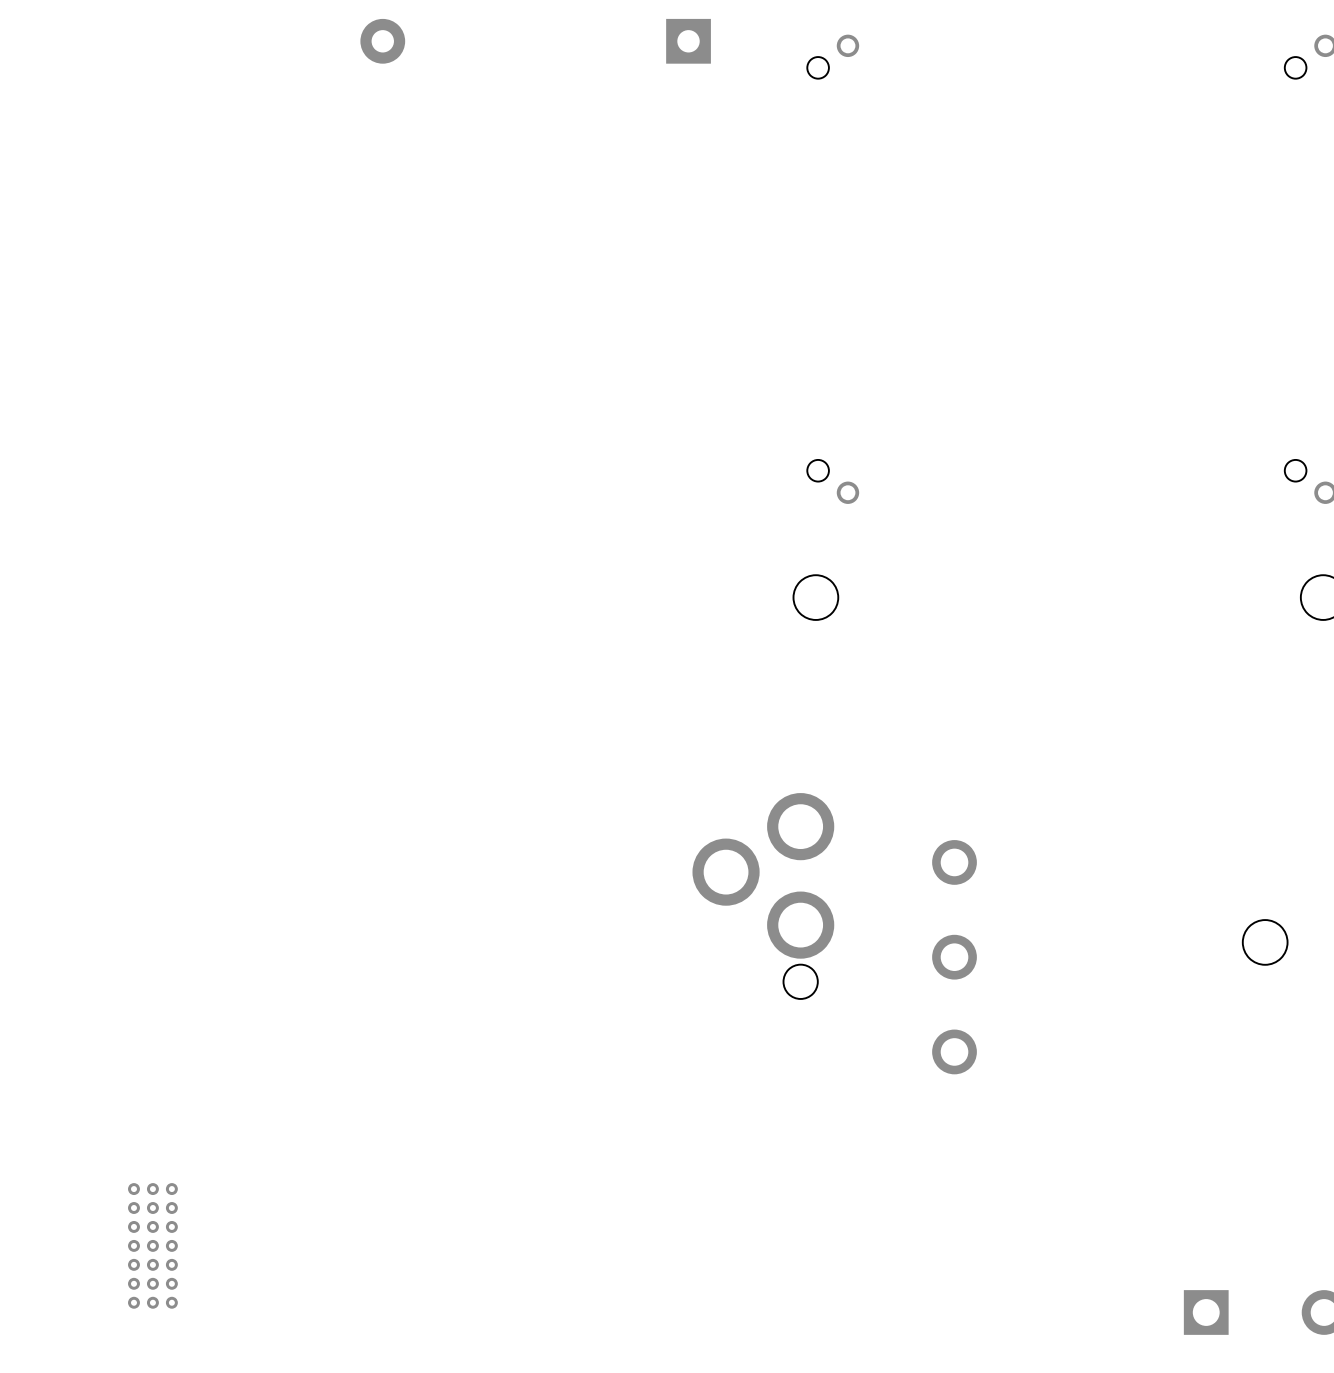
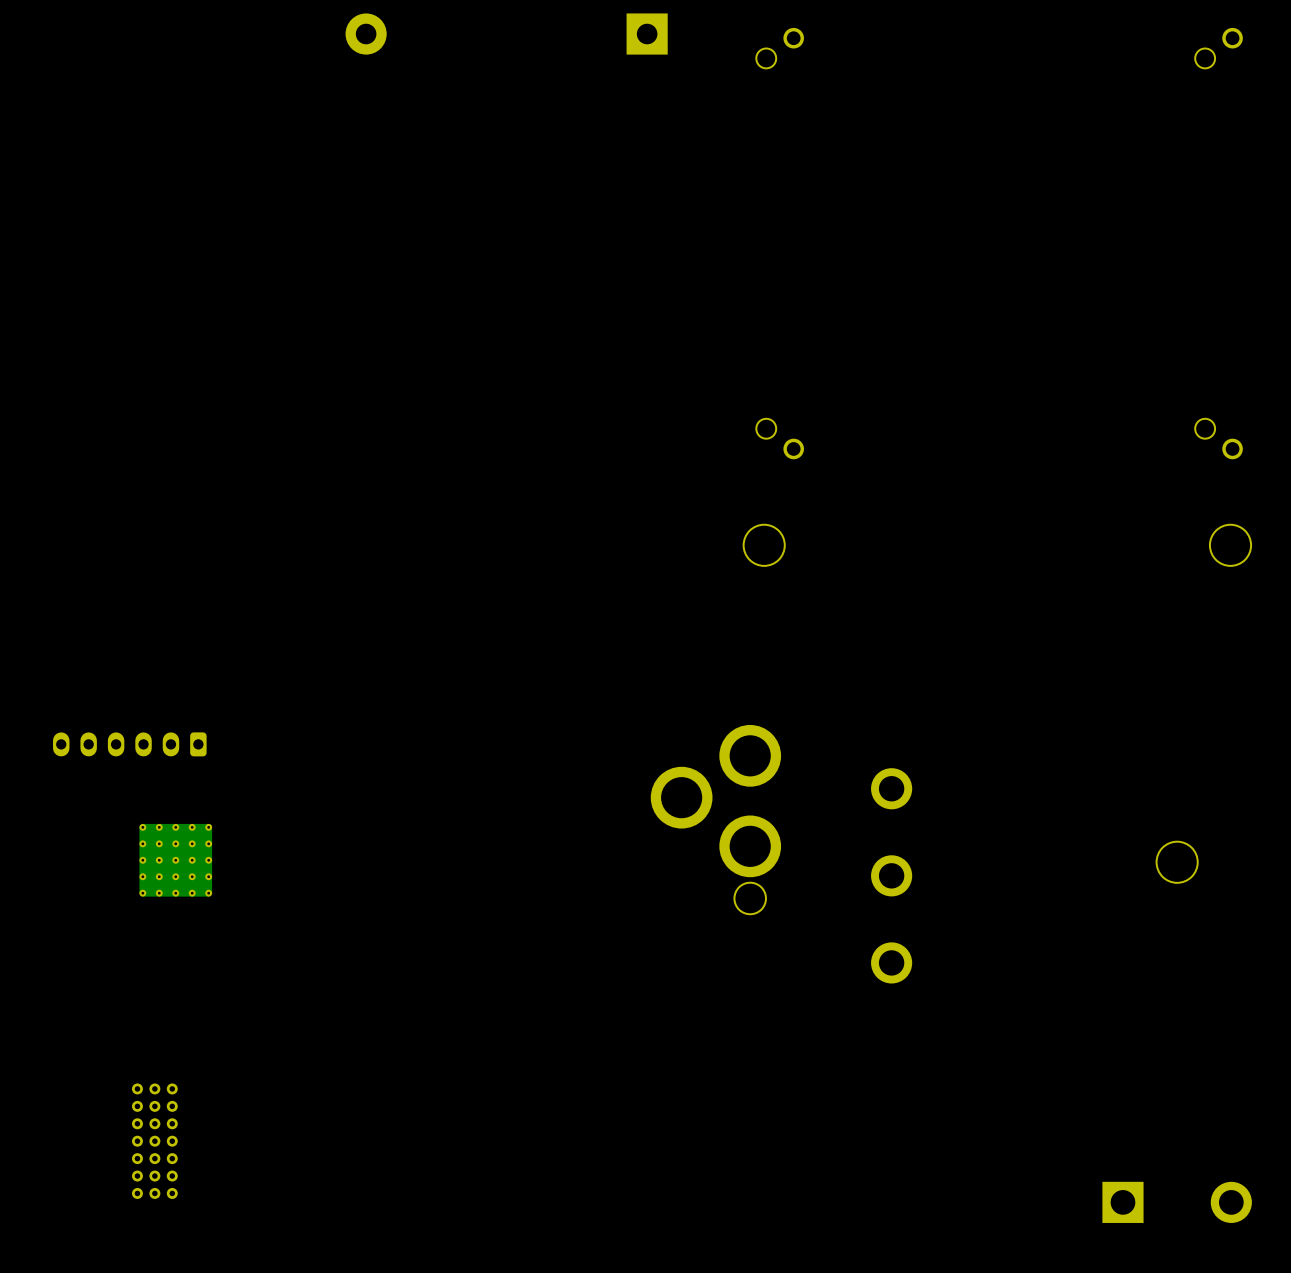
part: none -> (129, 744)
part: none -> (175, 860)

